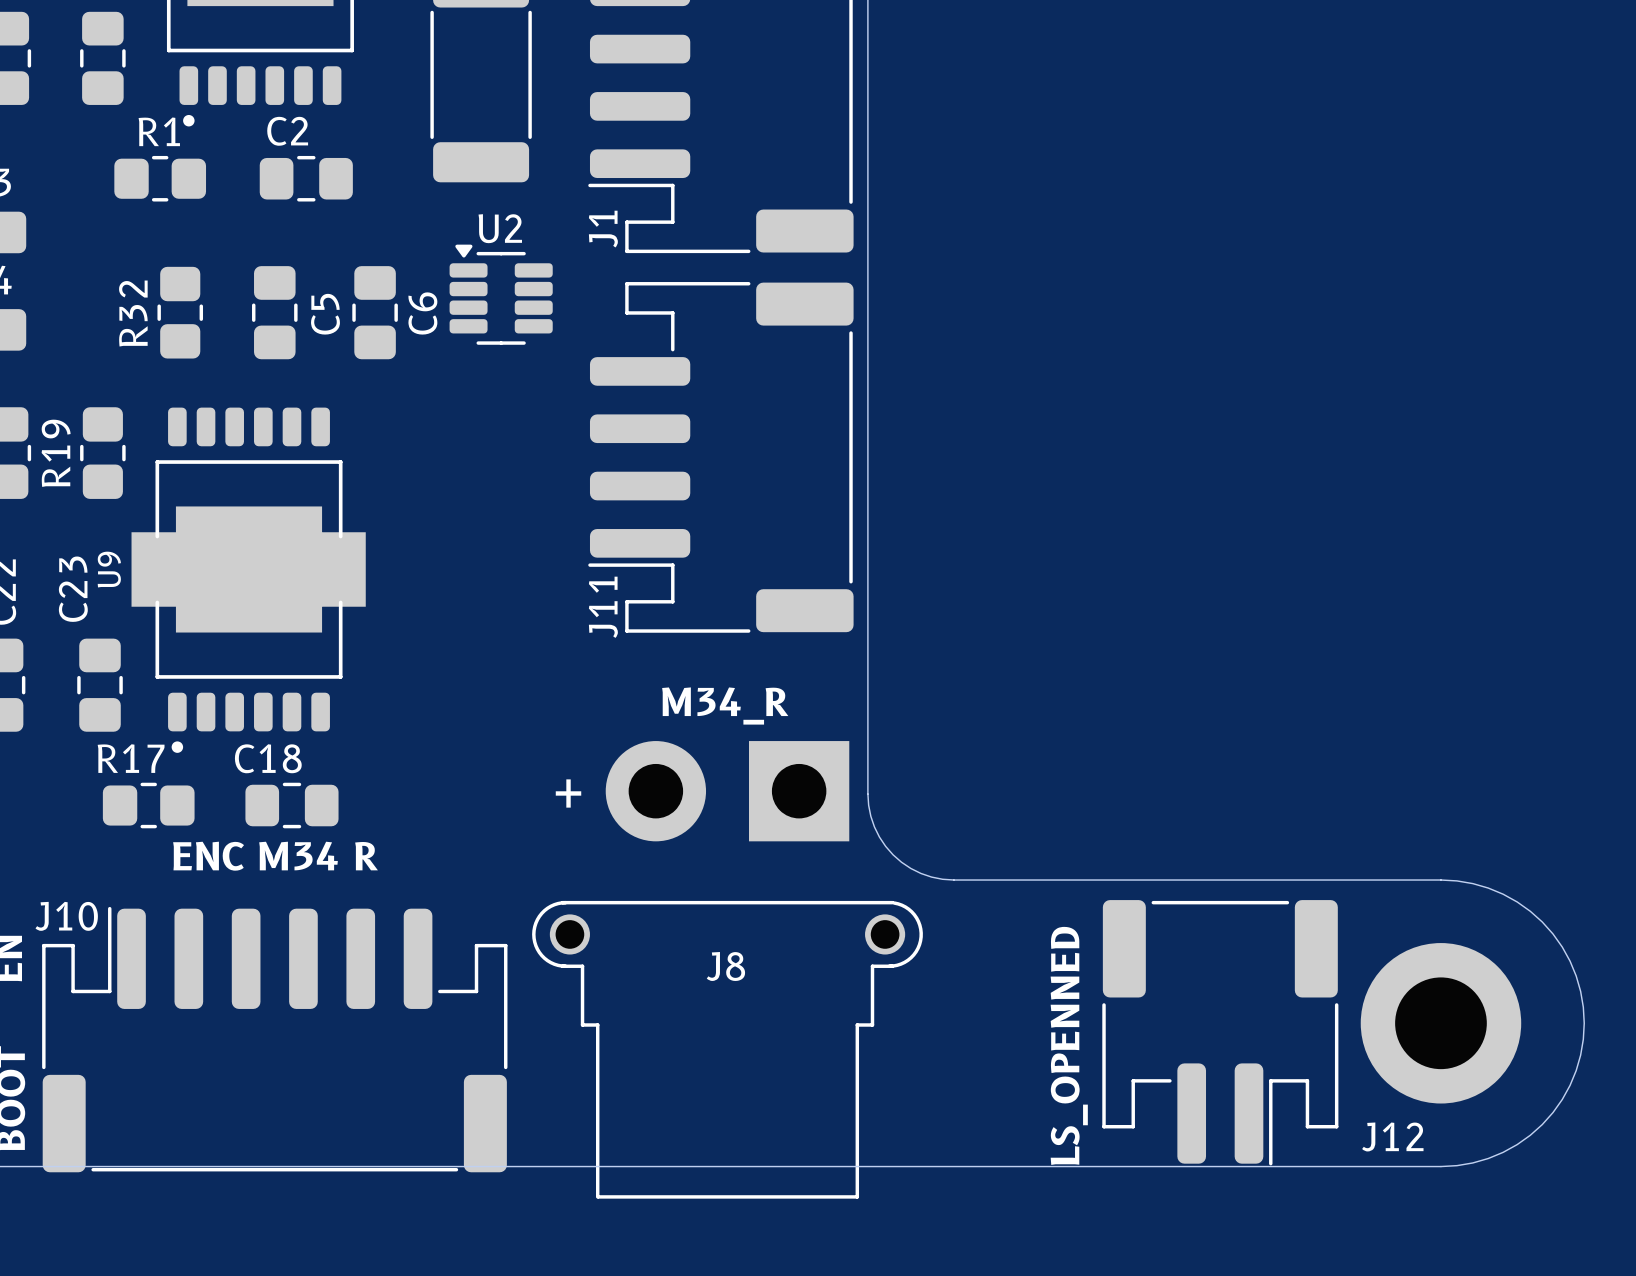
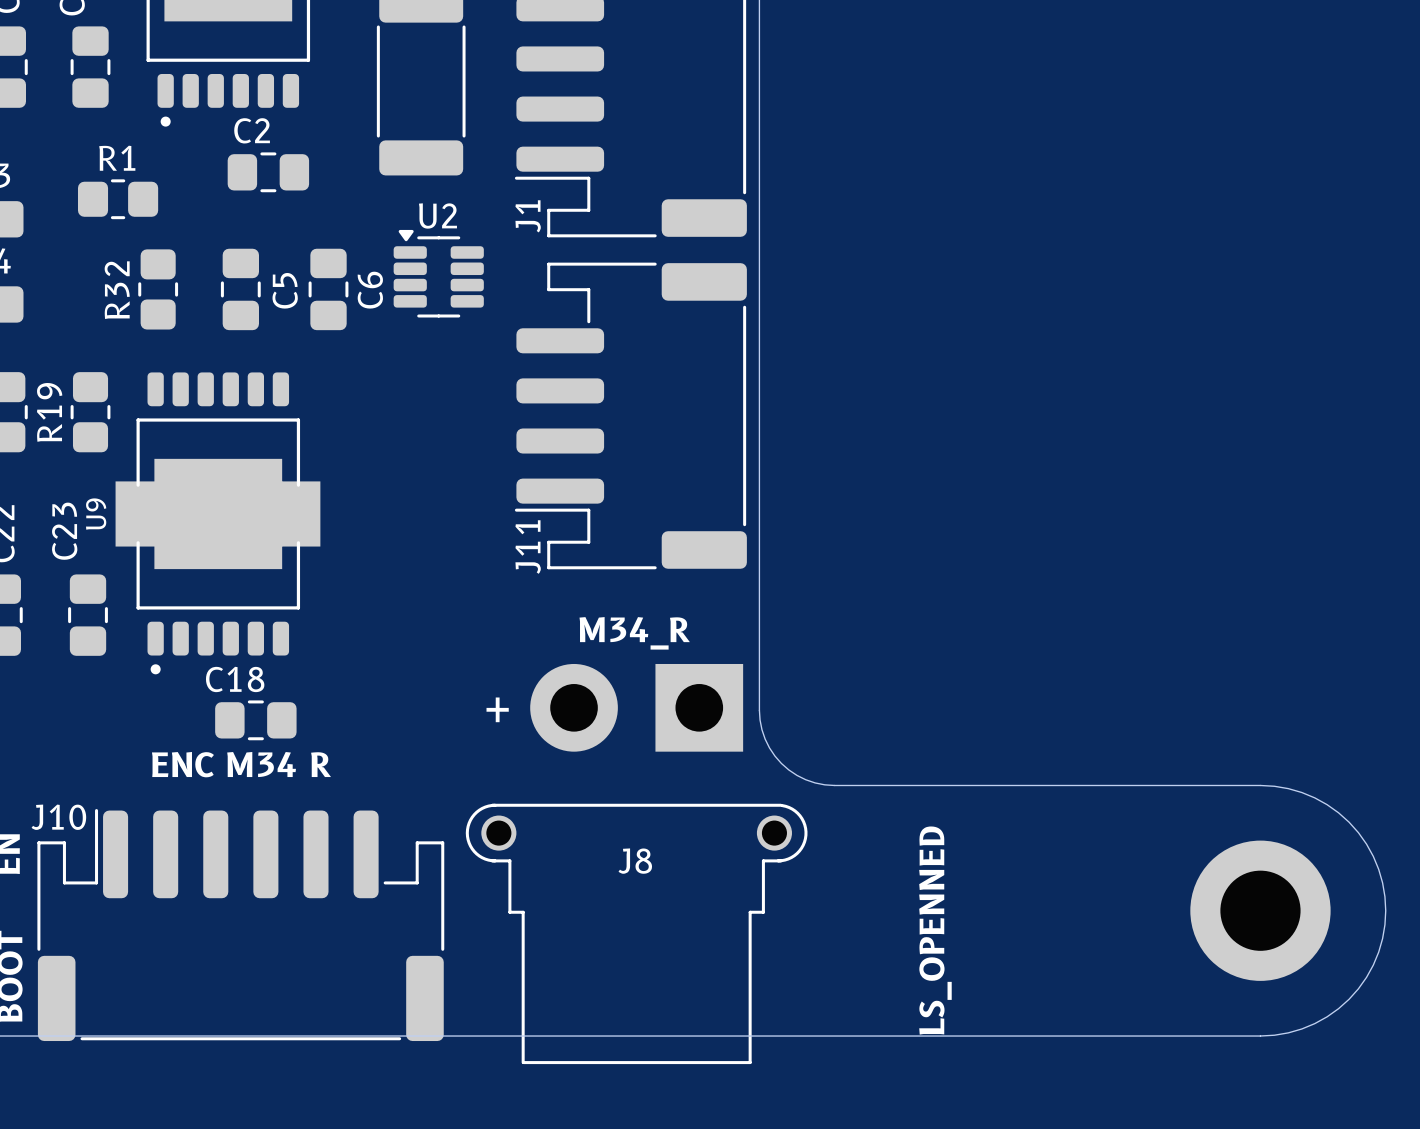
R1 position: (160, 178) -> (118, 199)
R17: (148, 805) -> none
J12: (1220, 1032) -> none

